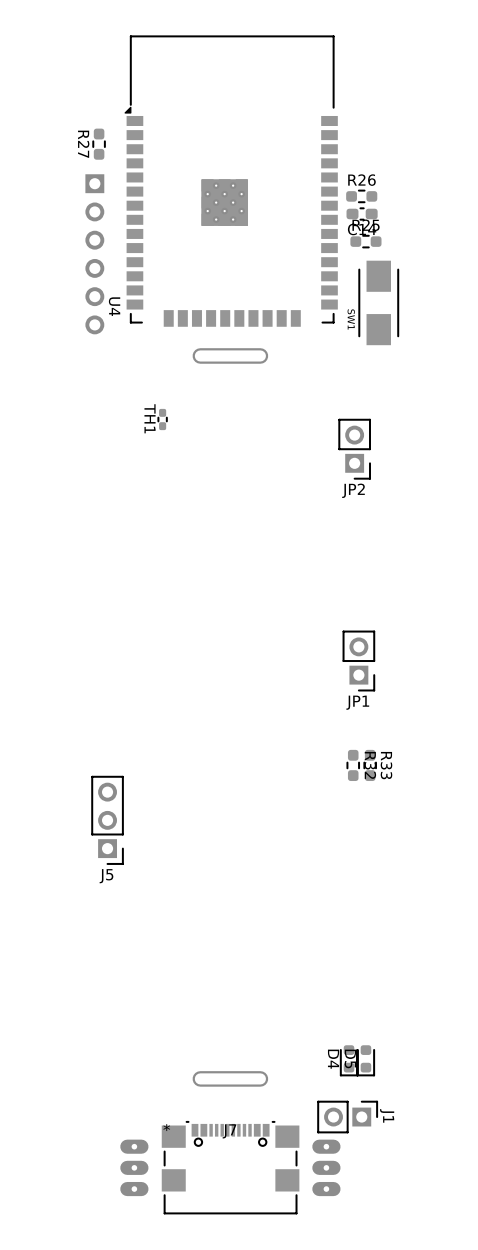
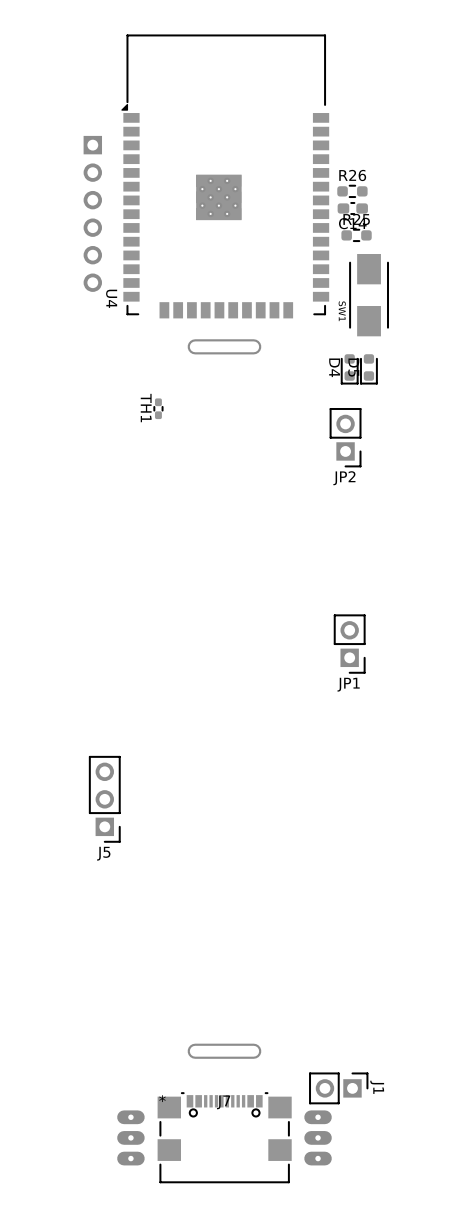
R27: (99, 144) -> none
part position: (94, 254) -> (92, 213)
R32: (353, 765) -> none
R33: (370, 765) -> none
D4 position: (349, 1060) -> (349, 369)
D5 position: (365, 1060) -> (368, 369)

